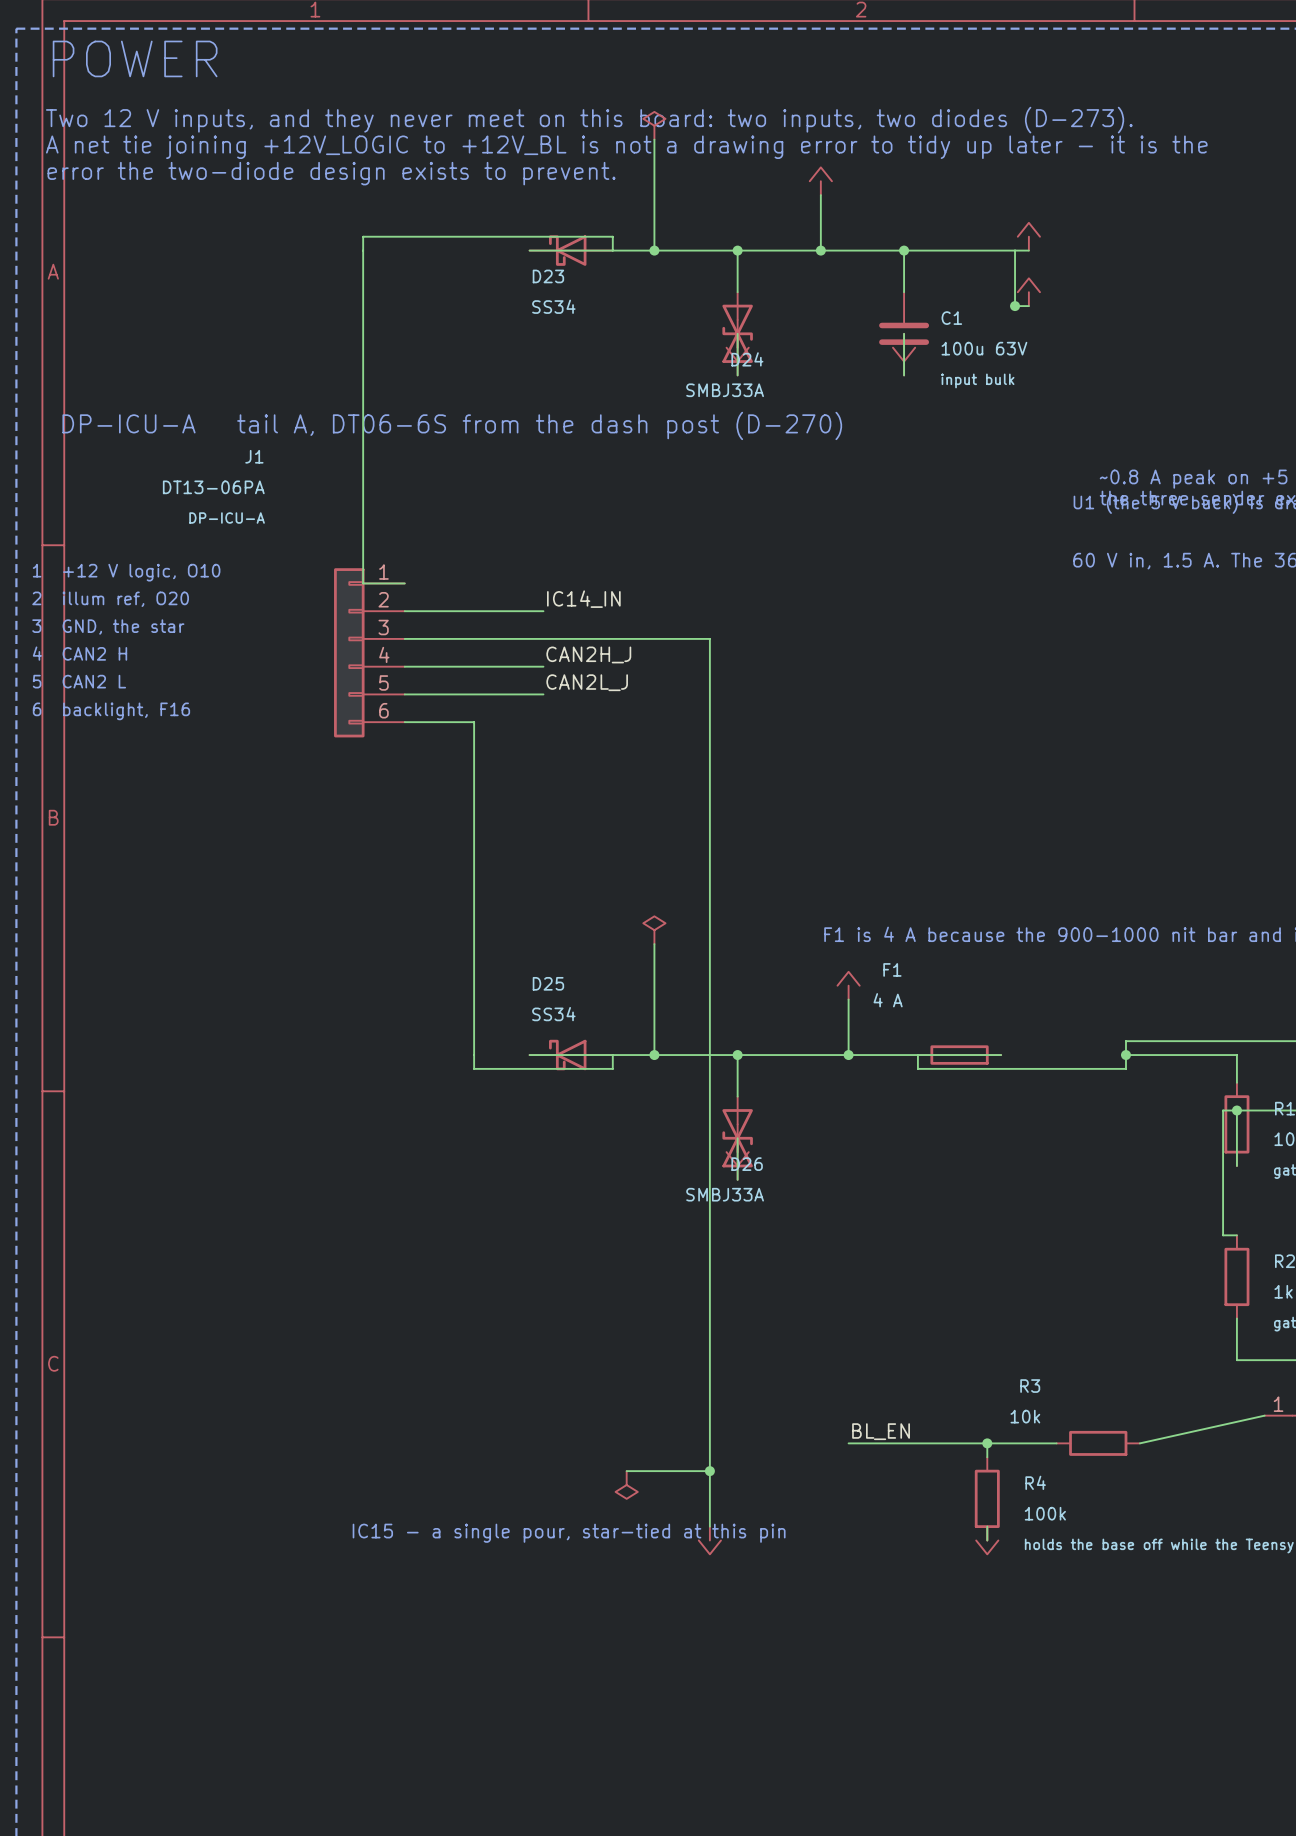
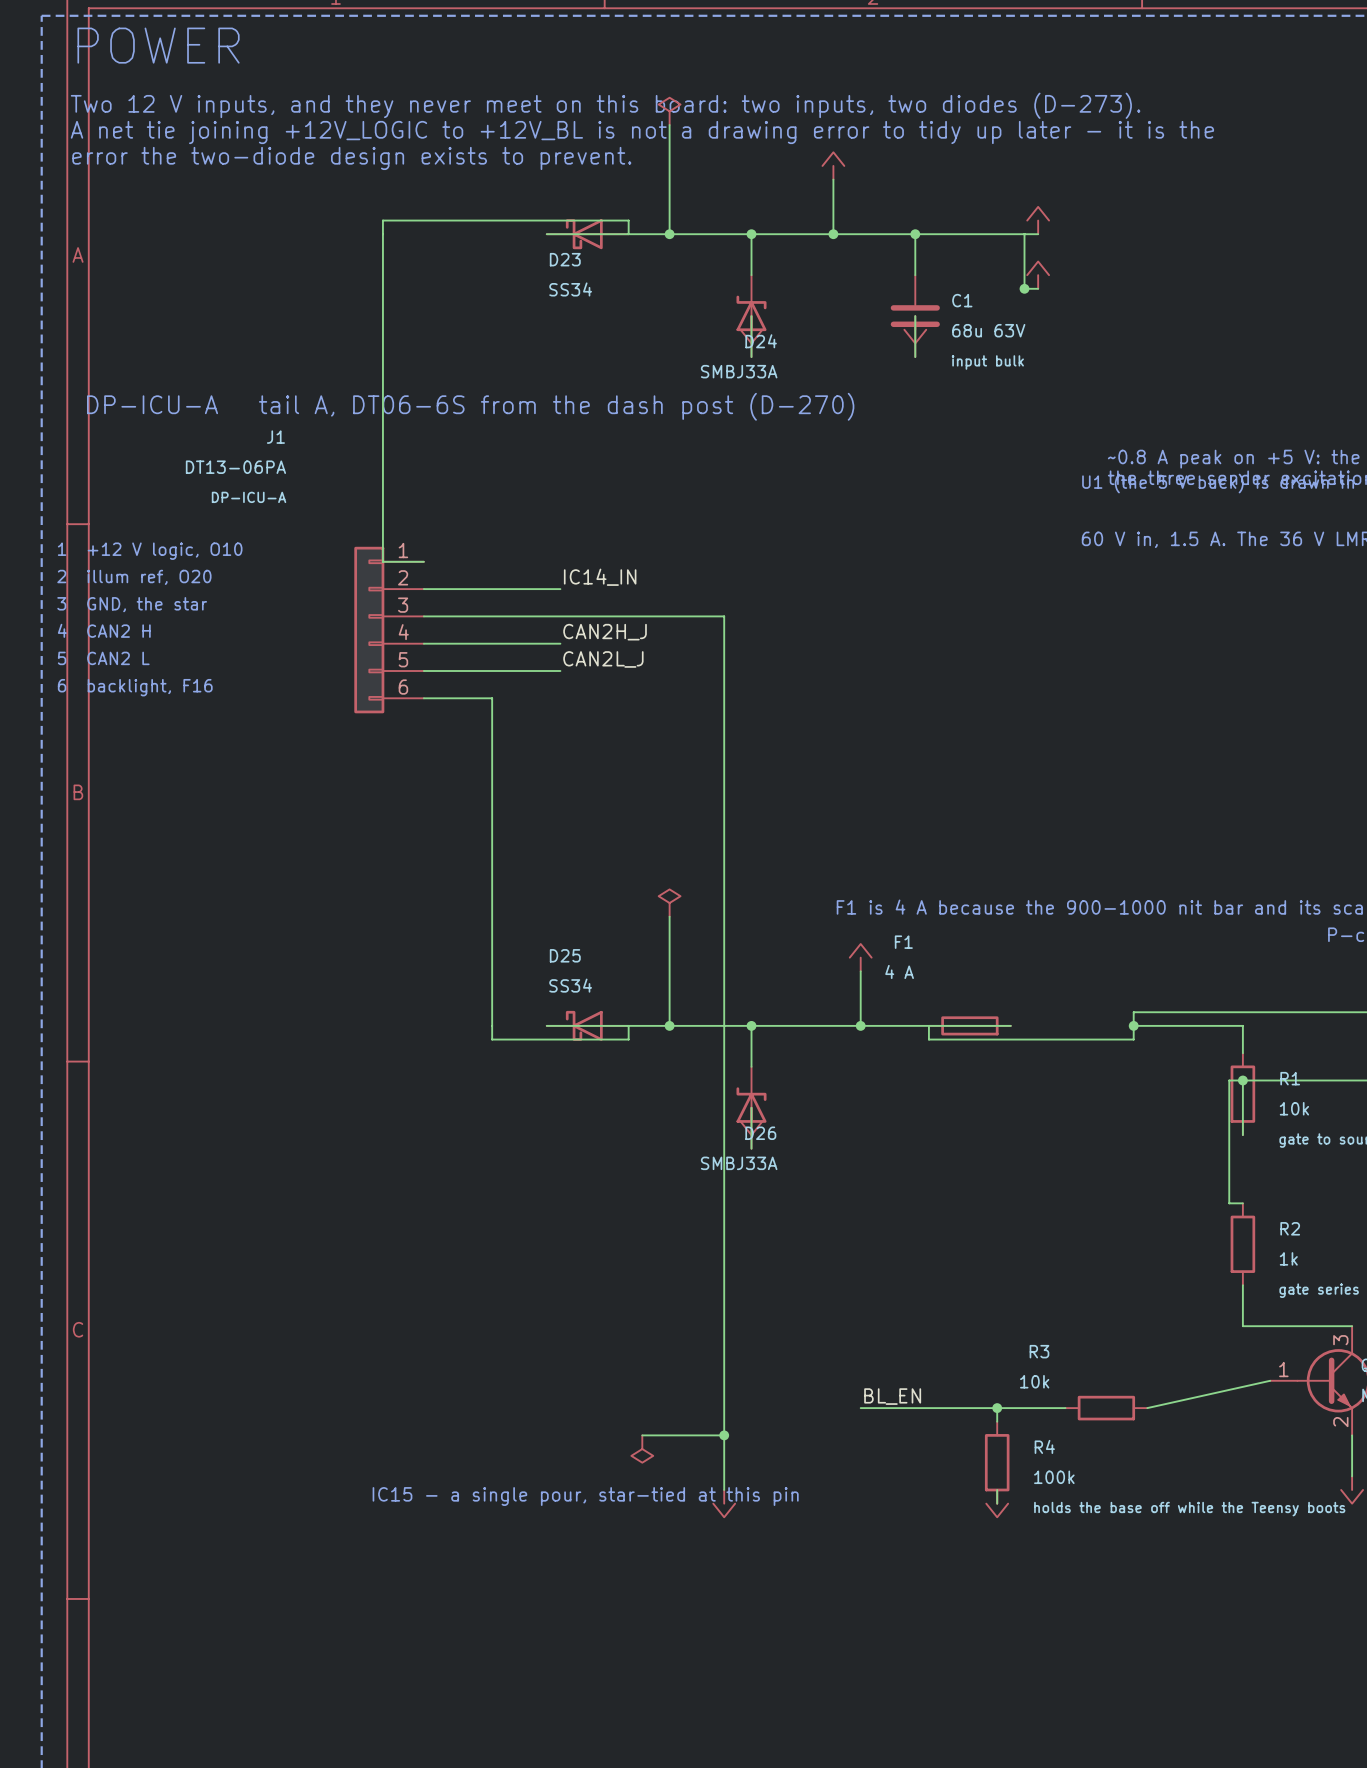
D24 symbol: [722, 292, 753, 376] -> [736, 275, 767, 358]
C1 value: 100u 63V (984, 348) -> 68u 63V (988, 330)
D26 symbol: [722, 1096, 753, 1180] -> [736, 1066, 767, 1149]

